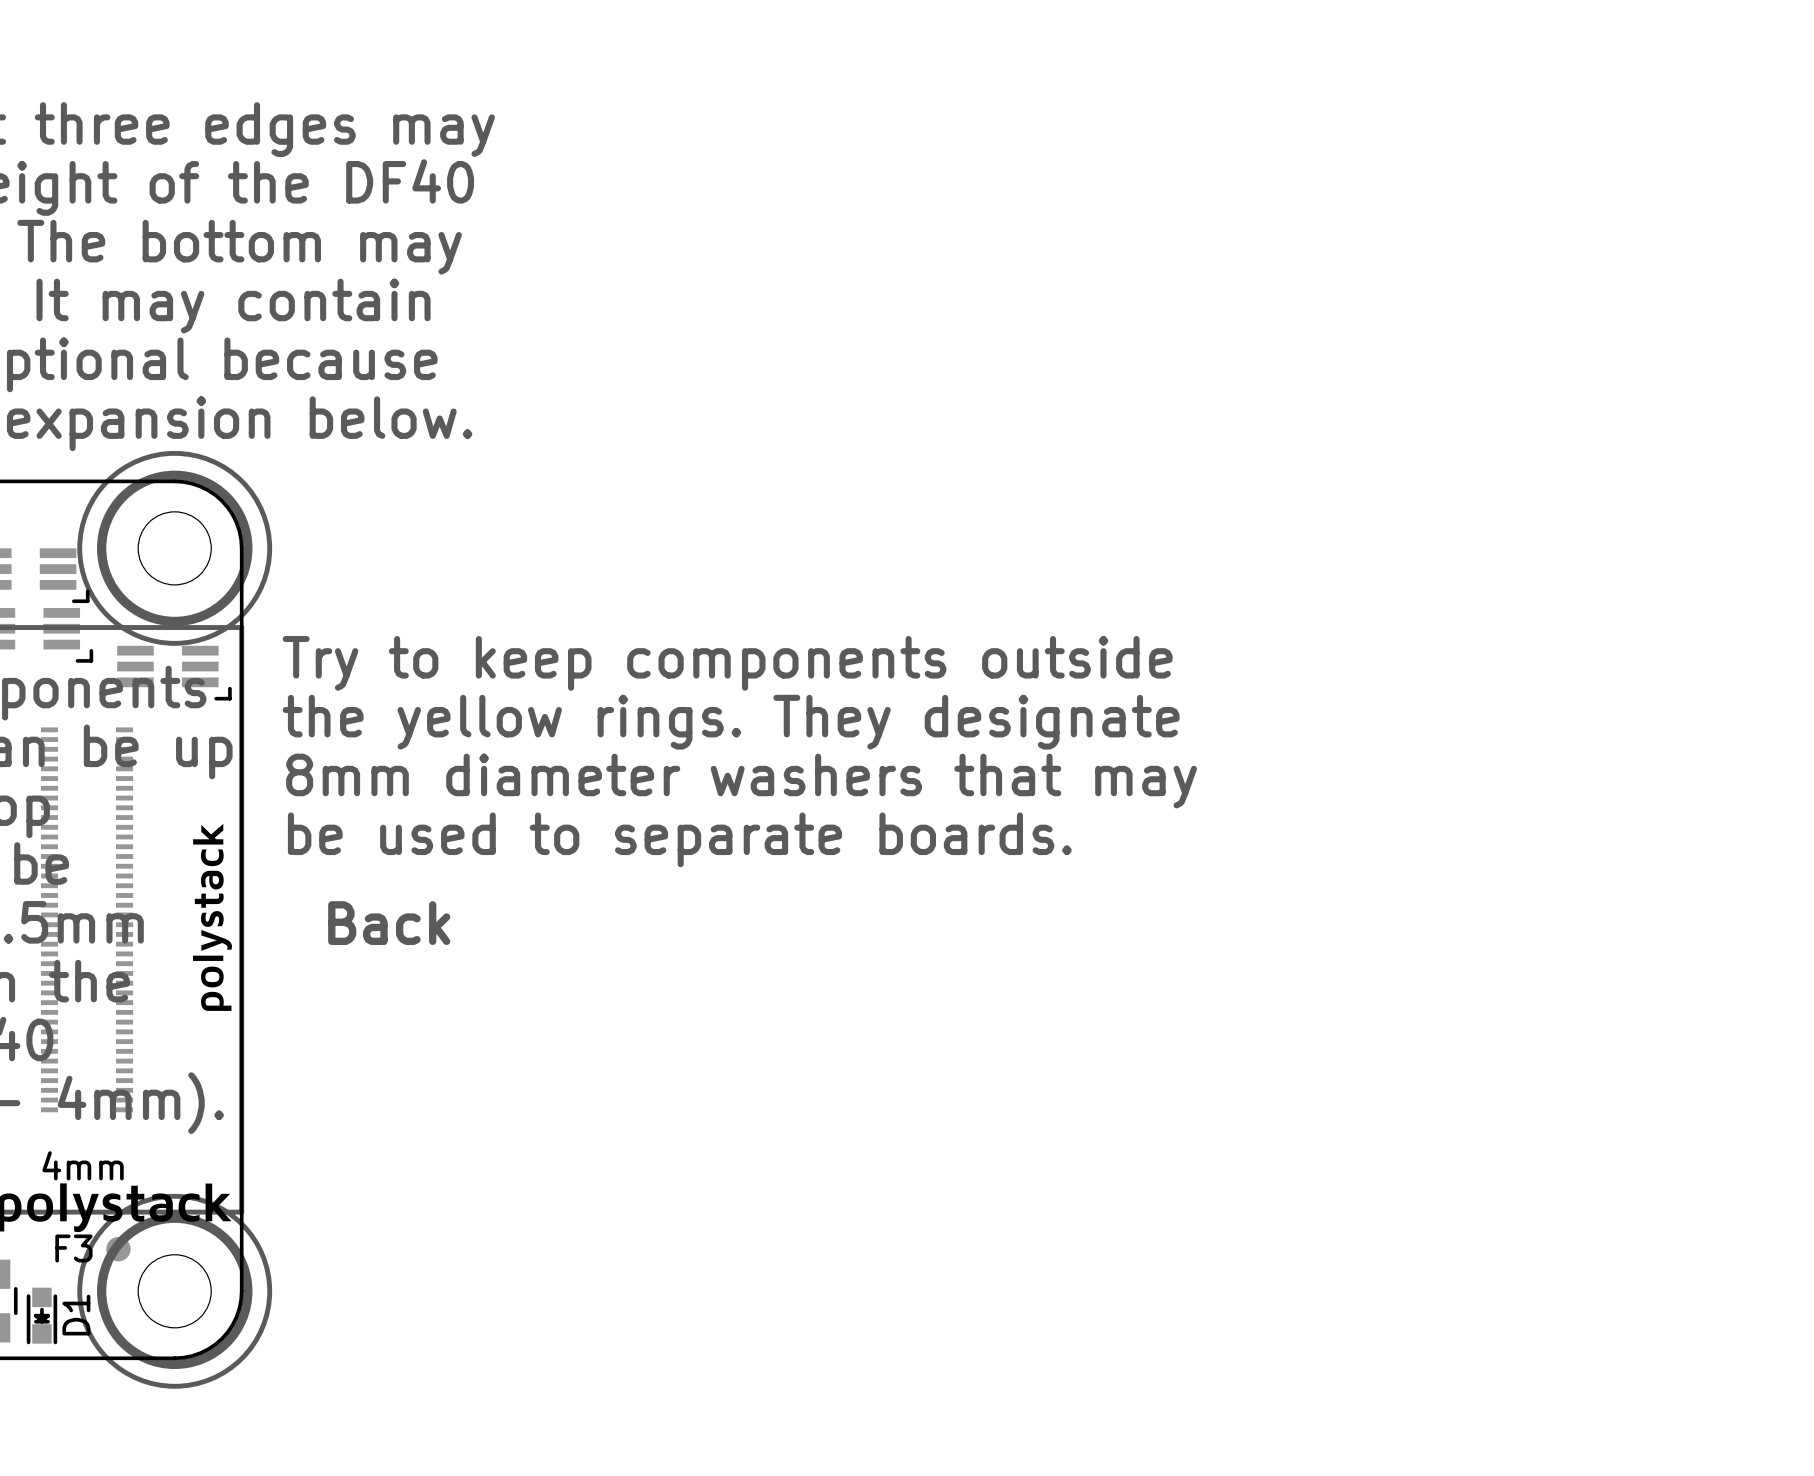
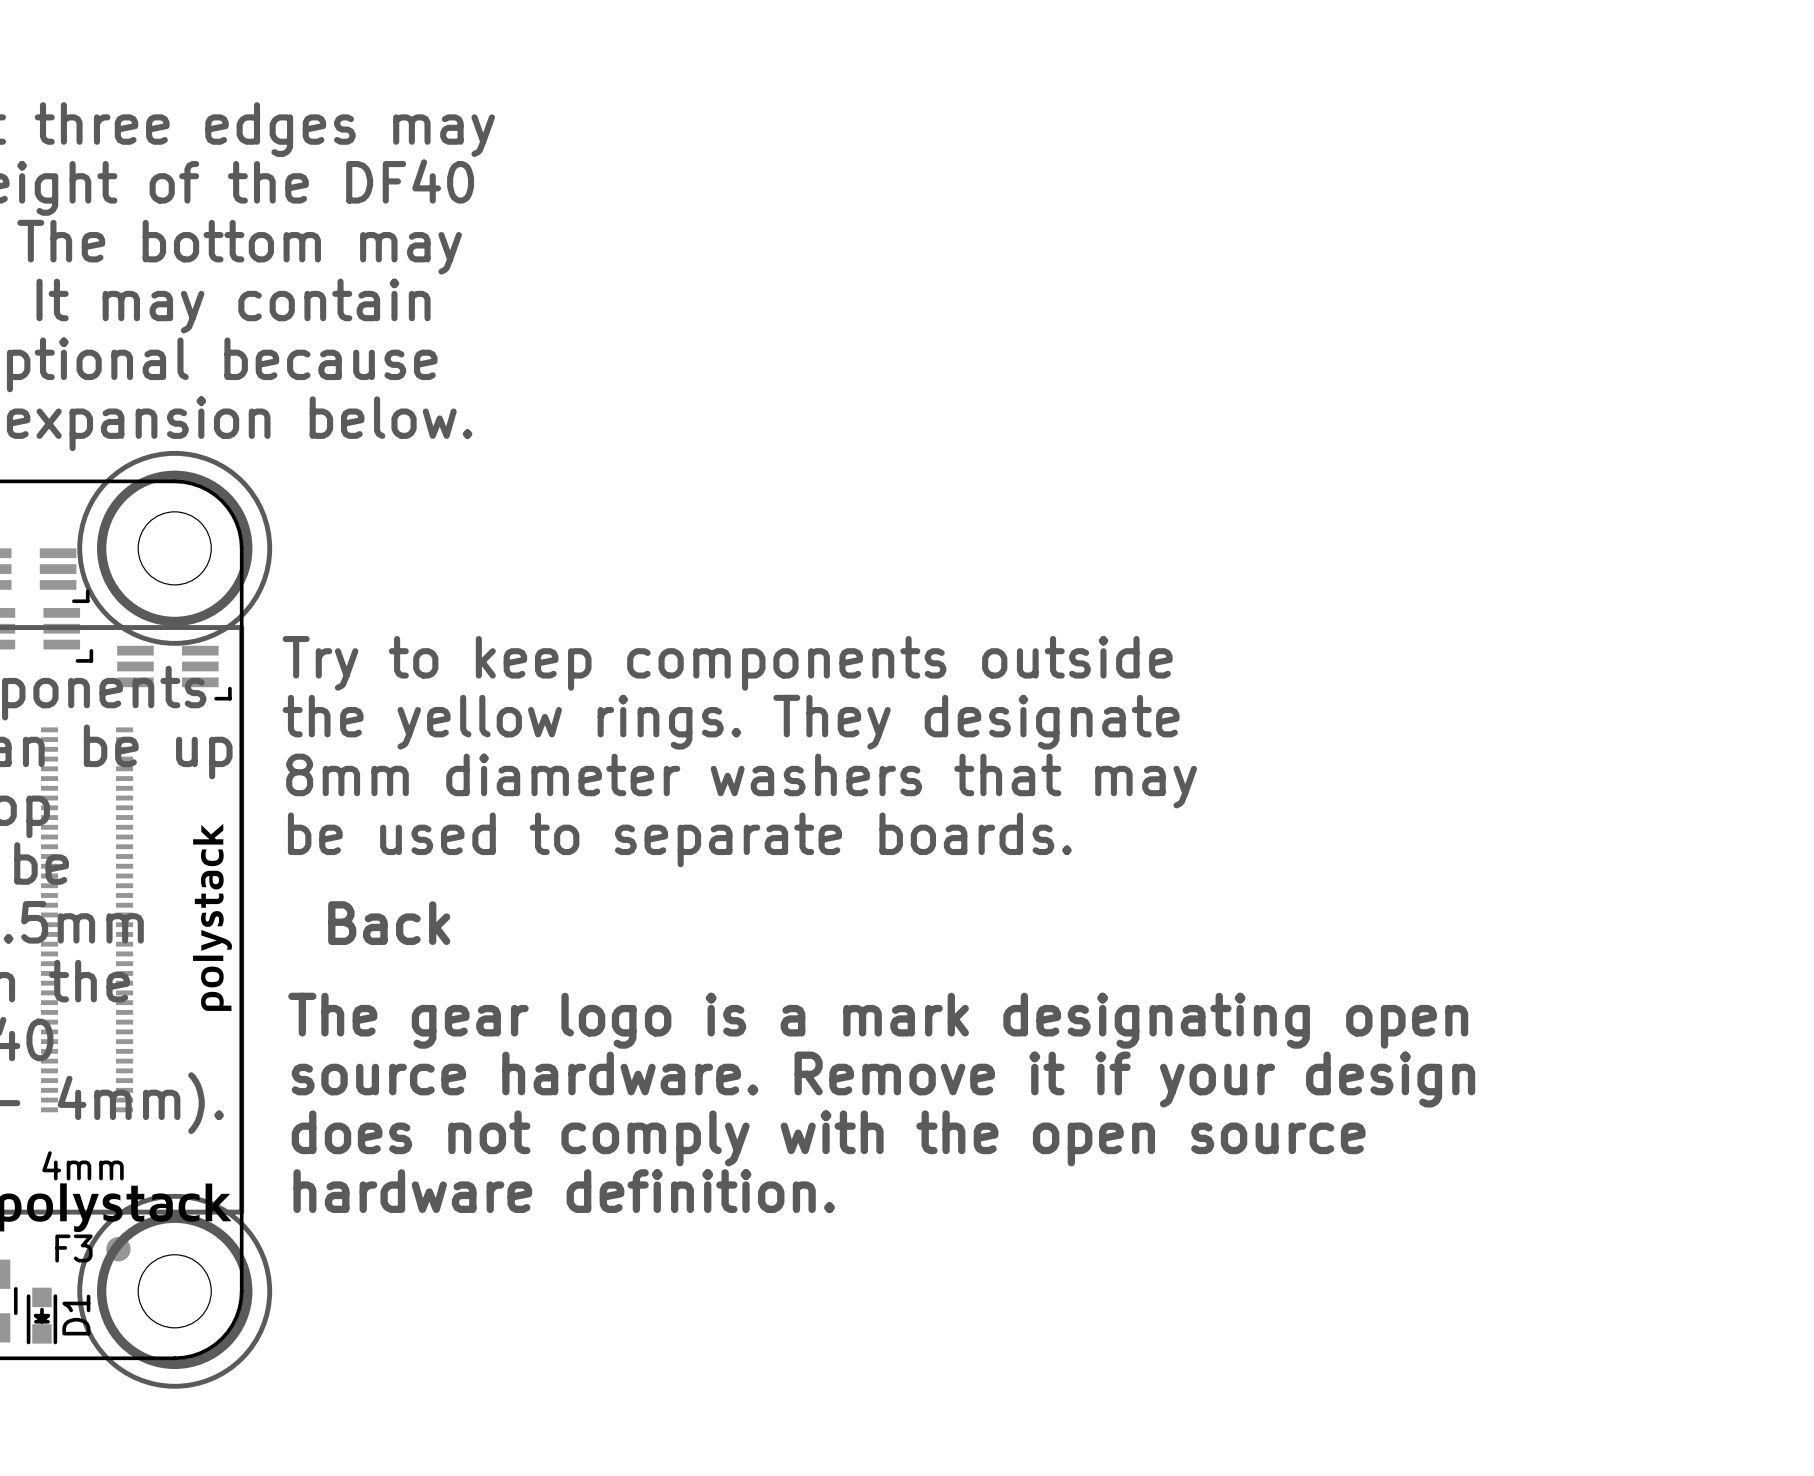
text: none -> The gear logo is a mark designating open (878, 1020)
text: none -> source hardware. Remove it if your design (883, 1079)
text: none -> does not comply with the open source (828, 1138)
text: none -> hardware definition. (564, 1191)

